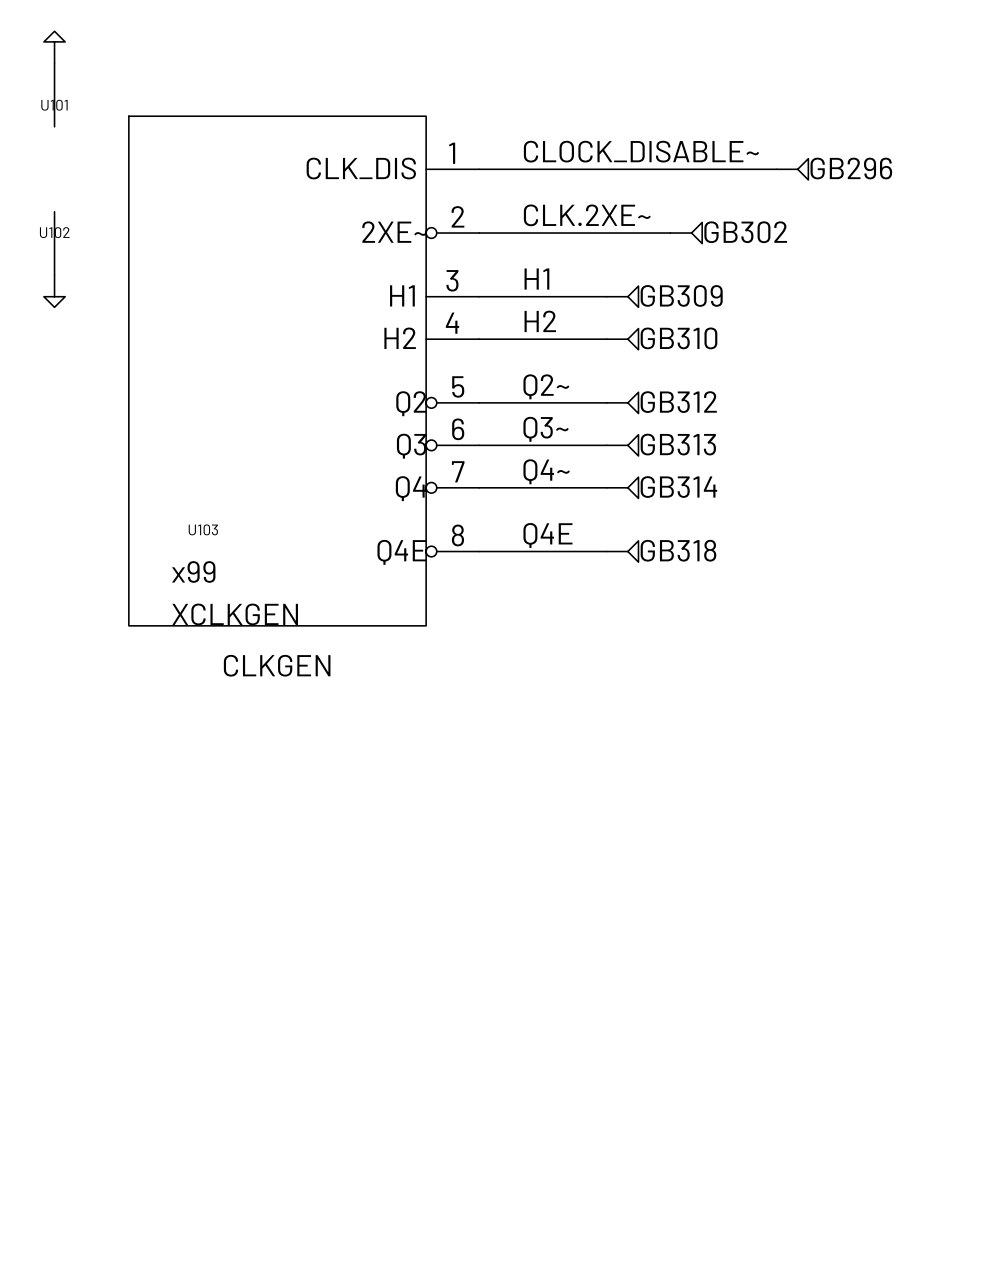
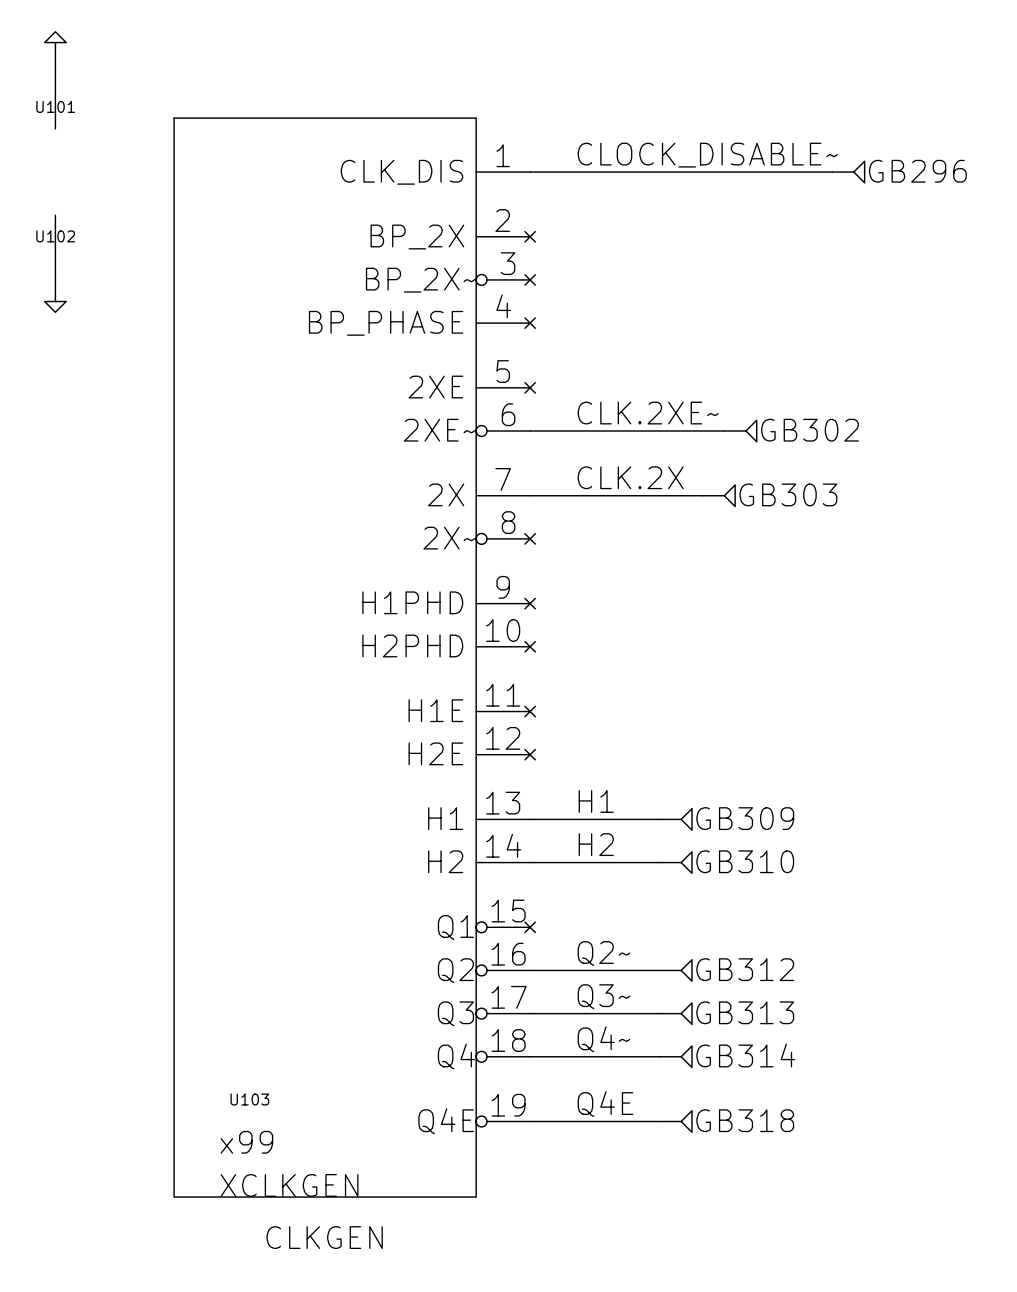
U103 symbol: [128, 116, 480, 626] -> [174, 118, 531, 1198]
label position: CLOCK_DISABLE~ (641, 151) -> CLOCK_DISABLE~ (707, 155)
GB296 position: (792, 169) -> (848, 172)
label position: CLK.2XE~ (587, 215) -> CLK.2XE~ (648, 413)
wire: (479, 233) (670, 233) -> (530, 430) (724, 430)
no-connect mark: none -> (530, 236)
GB302 position: (686, 233) -> (740, 430)
no-connect mark: none -> (530, 279)
label: H1 (536, 279) -> none
wire: (479, 296) (606, 296) -> none
GB309 position: (622, 296) -> (676, 819)
no-connect mark: none -> (530, 323)
label: H2 (540, 321) -> none
wire: (479, 339) (606, 339) -> none
GB310 position: (622, 339) -> (676, 862)
no-connect mark: none -> (530, 387)
label: Q2~ (546, 386) -> none
wire: (479, 402) (606, 402) -> none
GB312 position: (622, 402) -> (676, 970)
label: Q3~ (546, 429) -> none
wire: (479, 445) (606, 445) -> none
GB313 position: (622, 445) -> (676, 1013)
label: none -> CLK.2X (630, 477)
label: Q4~ (546, 471) -> none
wire: none -> (616, 495) (702, 495)
GB314 position: (622, 487) -> (676, 1056)
GB303: none -> (719, 495)
U103 name position: U103 (203, 529) -> U103 (249, 1099)
no-connect mark: none -> (530, 538)
label: Q4E (547, 535) -> none
wire: (479, 551) (606, 551) -> none
GB318 position: (622, 551) -> (676, 1121)
U103 text position: x99 (193, 571) -> x99 (246, 1142)
no-connect mark: none -> (530, 603)
U103 value position: XCLKGEN (235, 614) -> XCLKGEN (289, 1185)
no-connect mark: none -> (530, 646)
U103 text position: CLKGEN (277, 665) -> CLKGEN (324, 1237)
no-connect mark: none -> (530, 711)
no-connect mark: none -> (530, 754)
label: none -> H1 (596, 801)
wire: none -> (530, 819) (659, 819)
label: none -> H2 (596, 844)
wire: none -> (530, 862) (659, 862)
no-connect mark: none -> (530, 927)
label: none -> Q2~ (603, 953)
wire: none -> (530, 970) (659, 970)
label: none -> Q3~ (603, 996)
wire: none -> (530, 1013) (659, 1013)
label: none -> Q4~ (603, 1039)
wire: none -> (530, 1056) (659, 1056)
label: none -> Q4E (605, 1104)
wire: none -> (530, 1121) (659, 1121)

